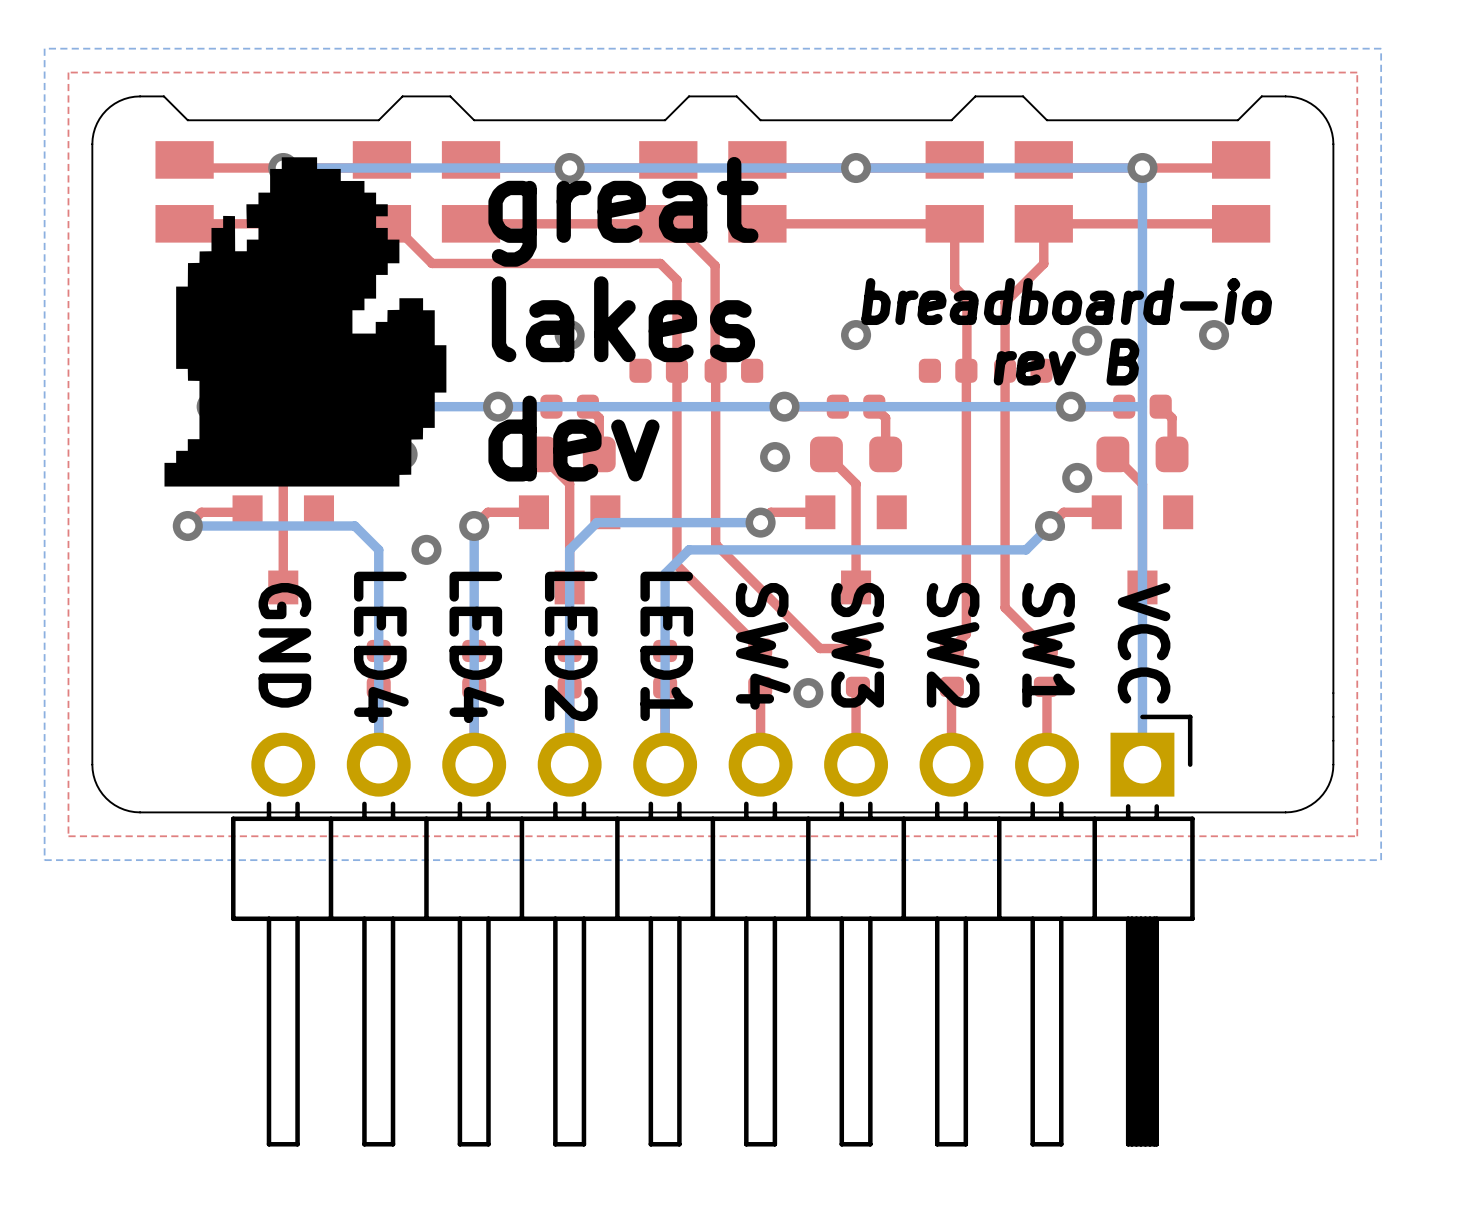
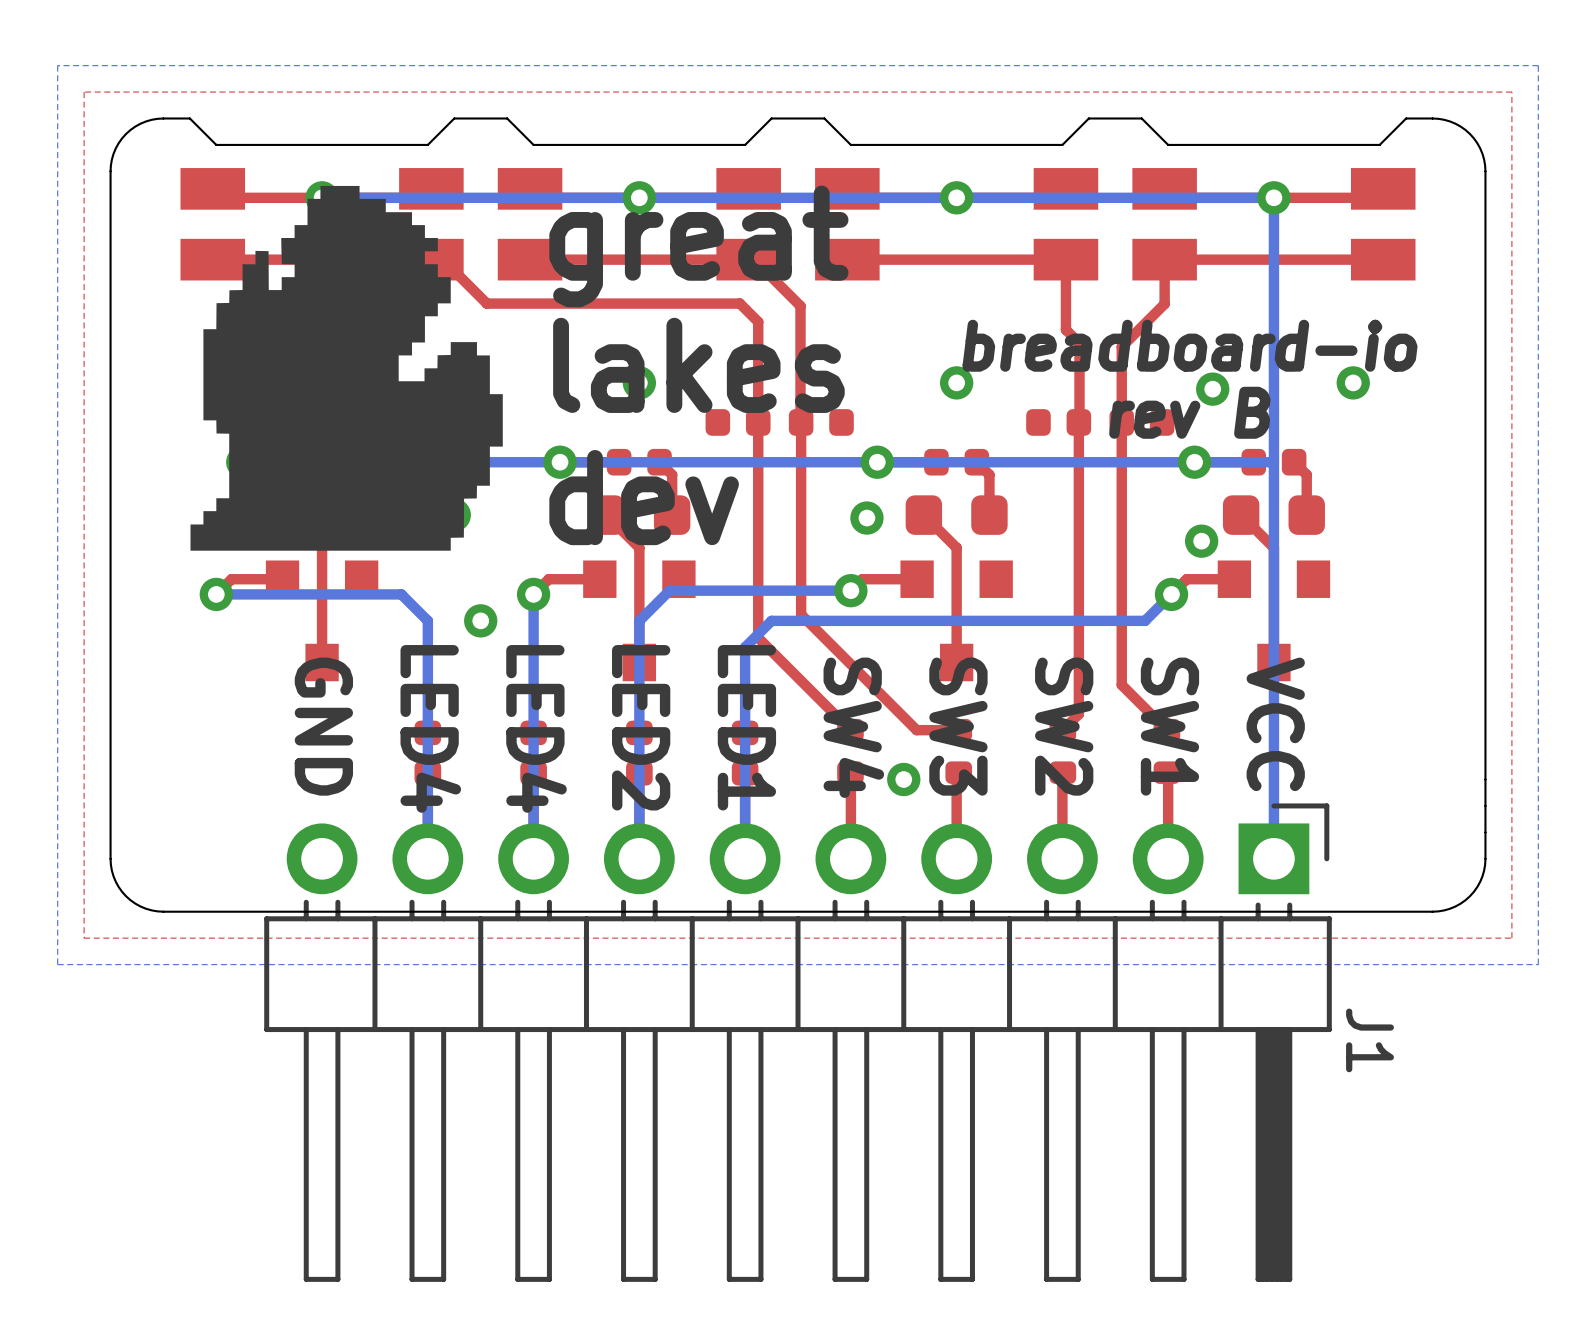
J1 name: none -> J1 (1370, 1040)

